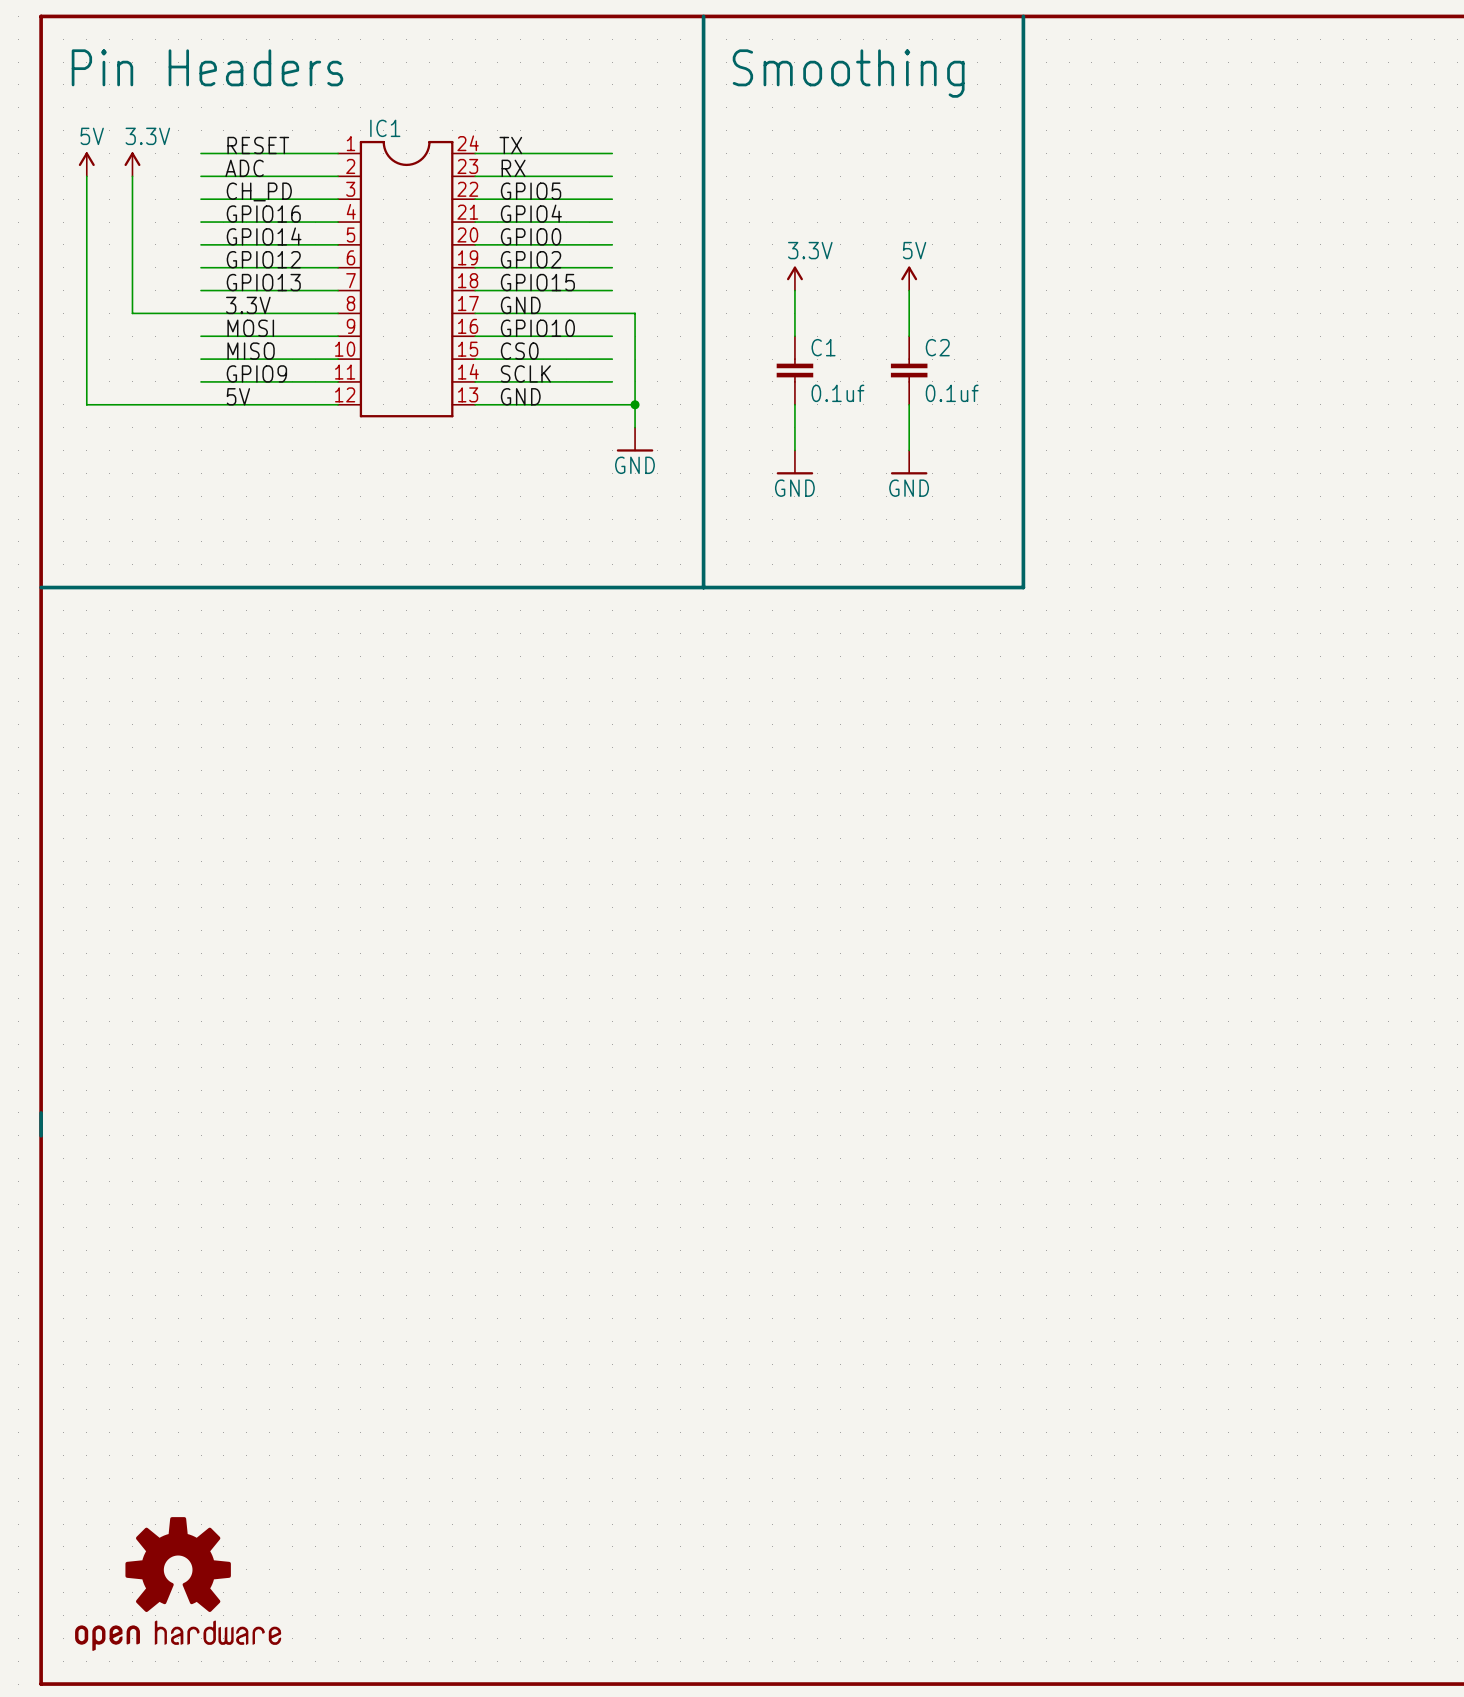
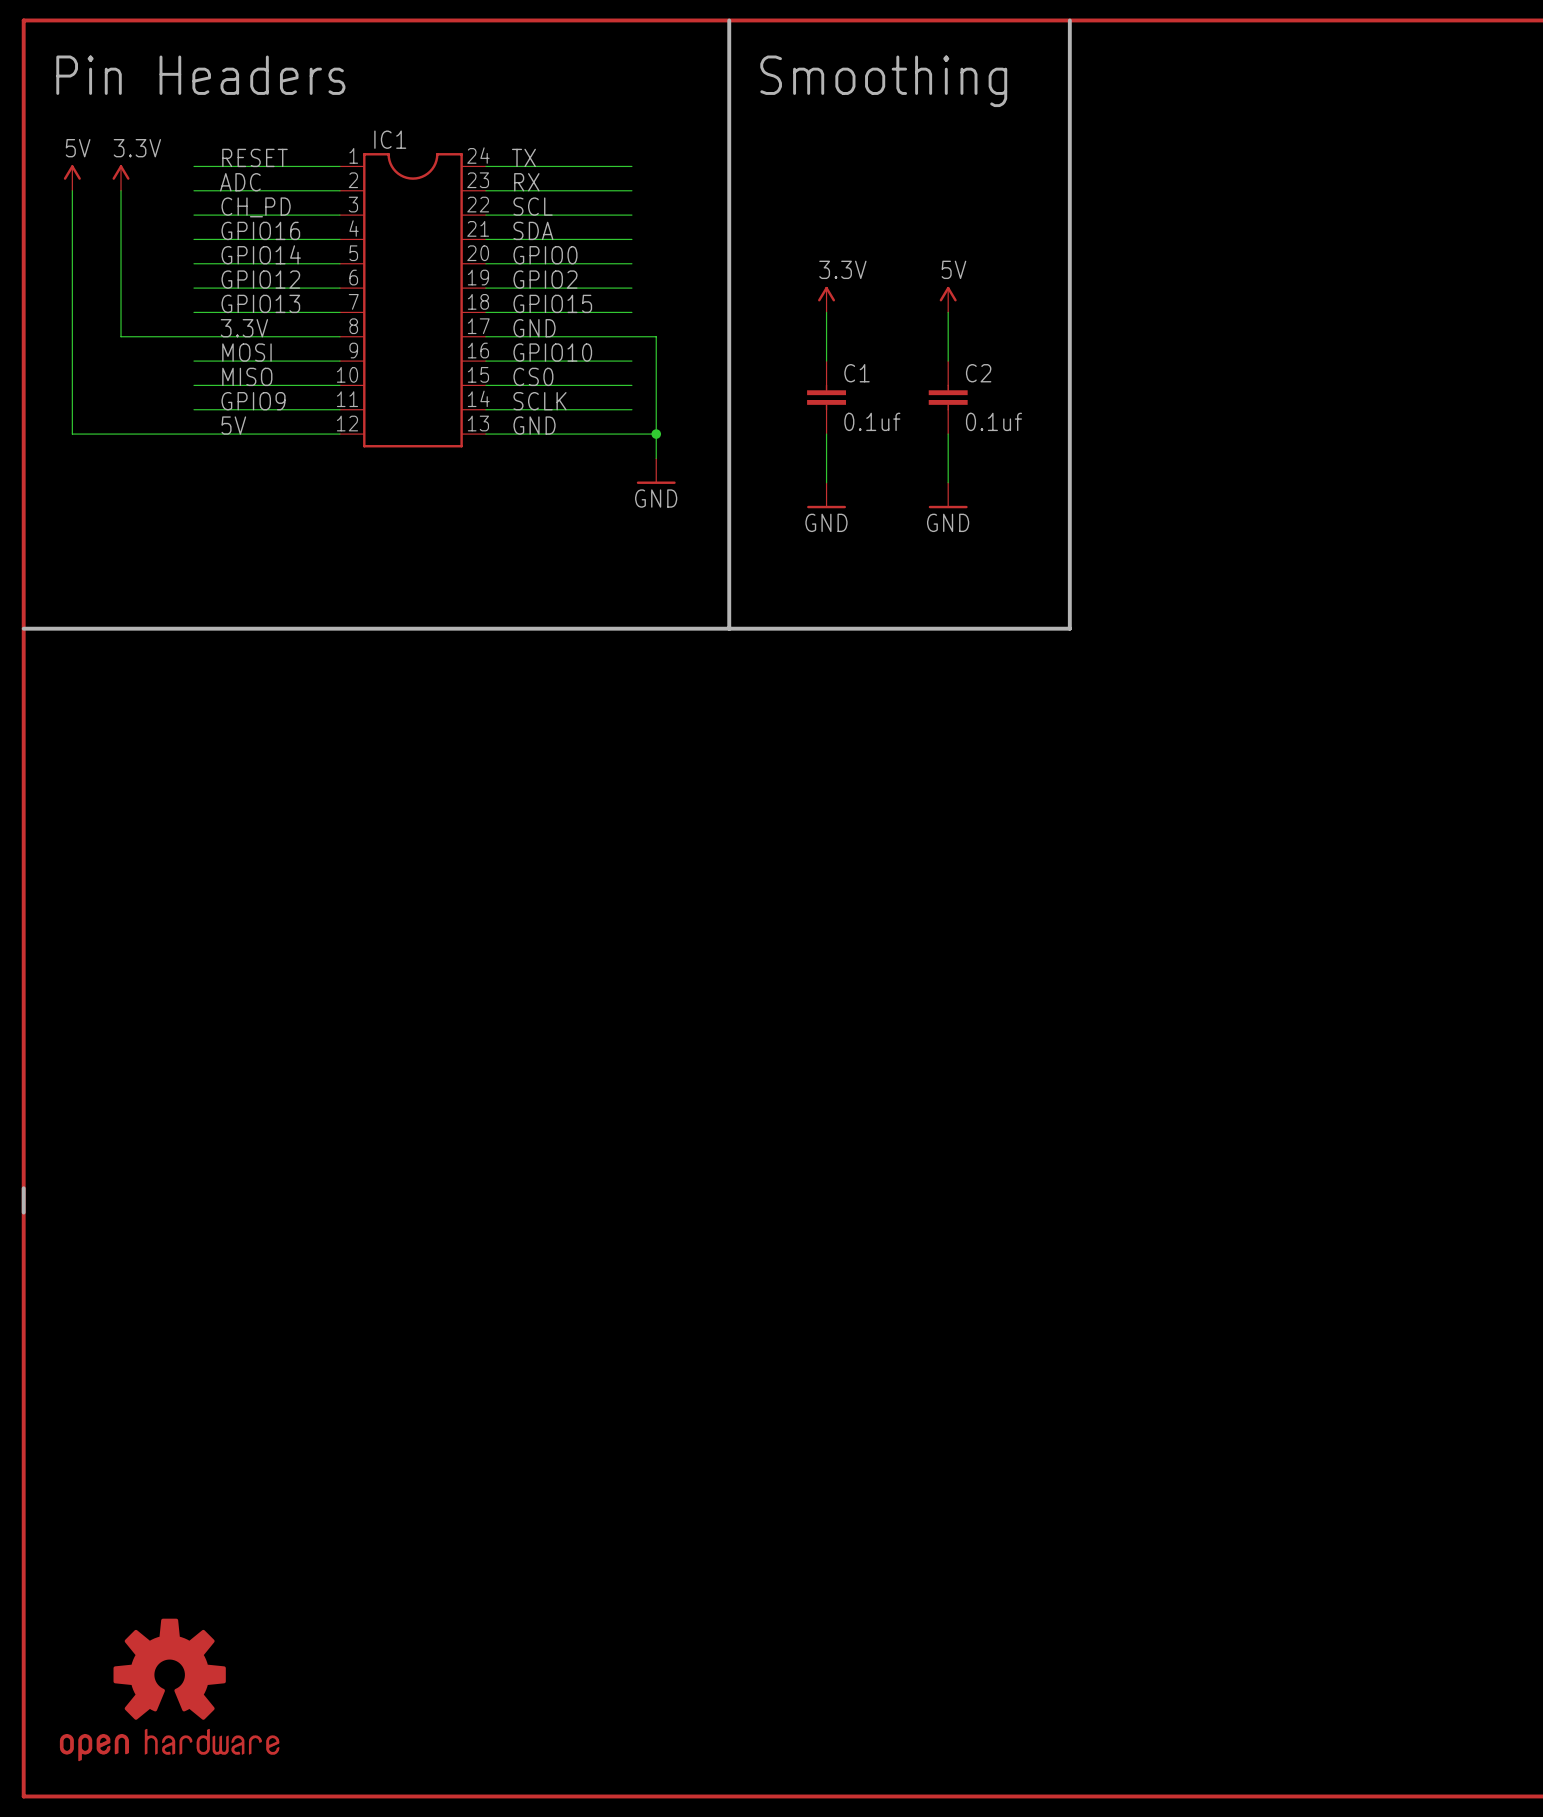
label: GPIO5 (531, 191) -> SCL (533, 206)
label: GPIO4 (531, 213) -> SDA (533, 230)

